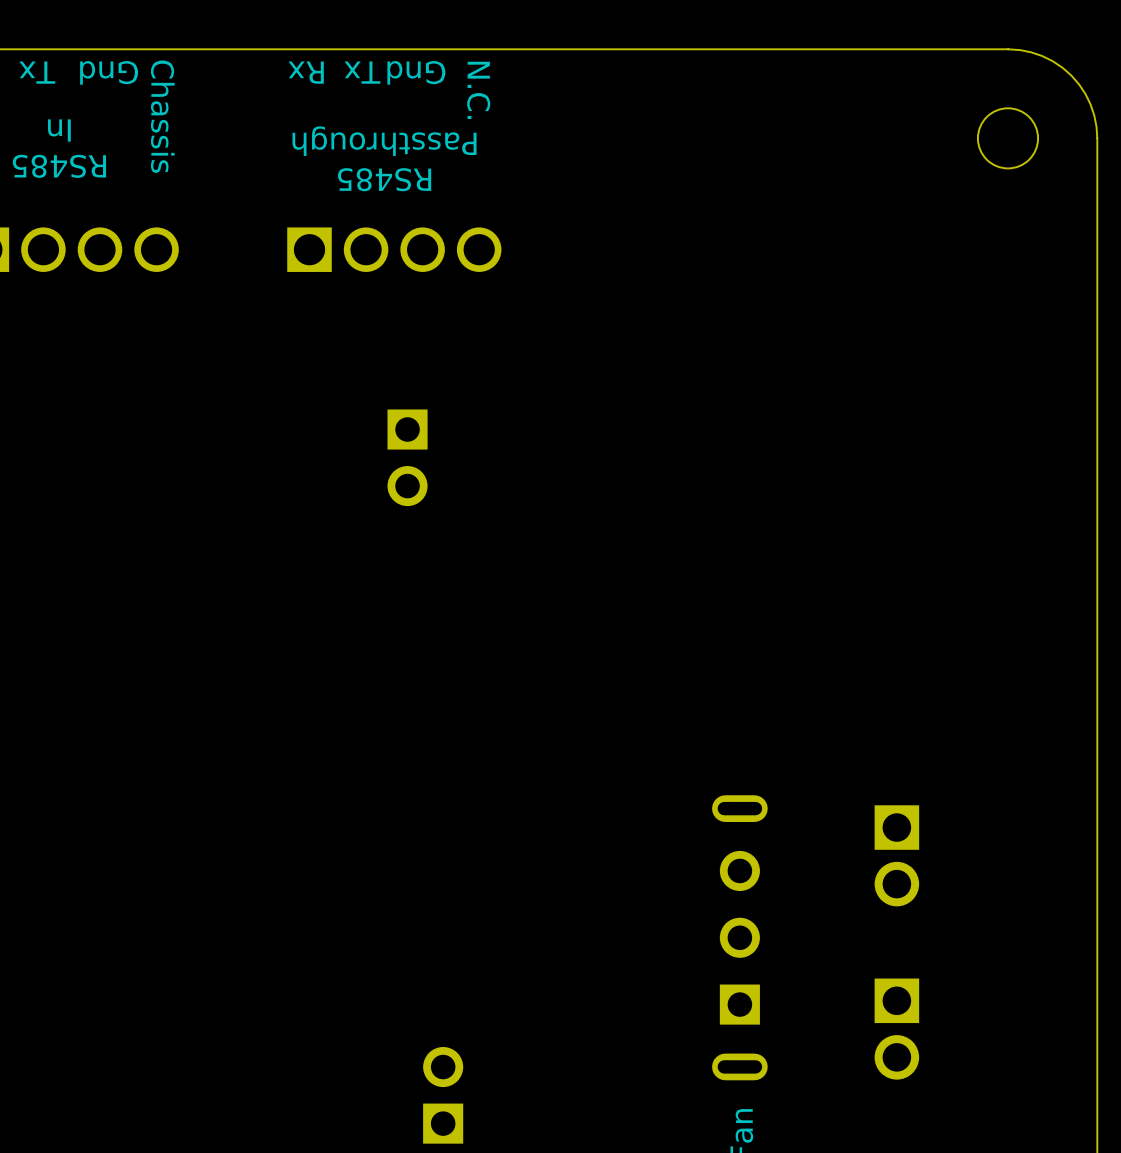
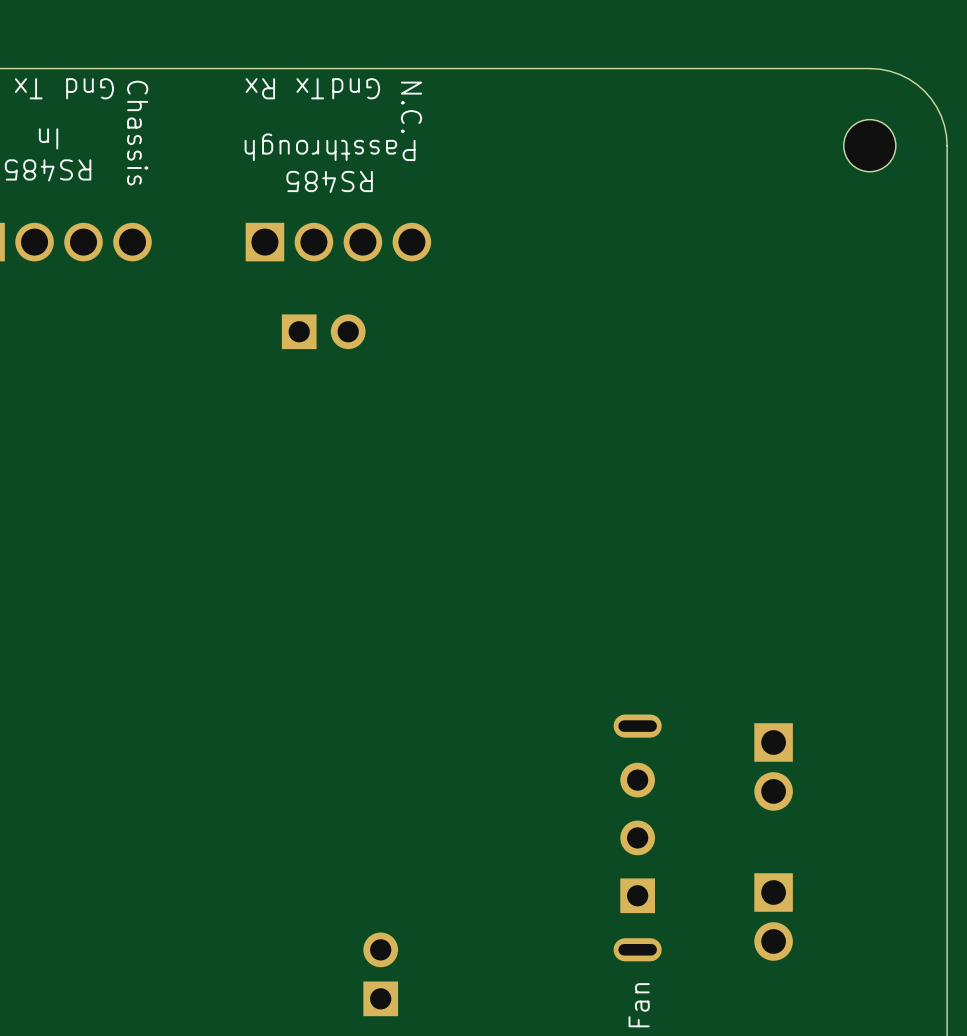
part rotation: 0° (407, 457) -> 90° counterclockwise (323, 331)
part position: (407, 457) -> (323, 331)

